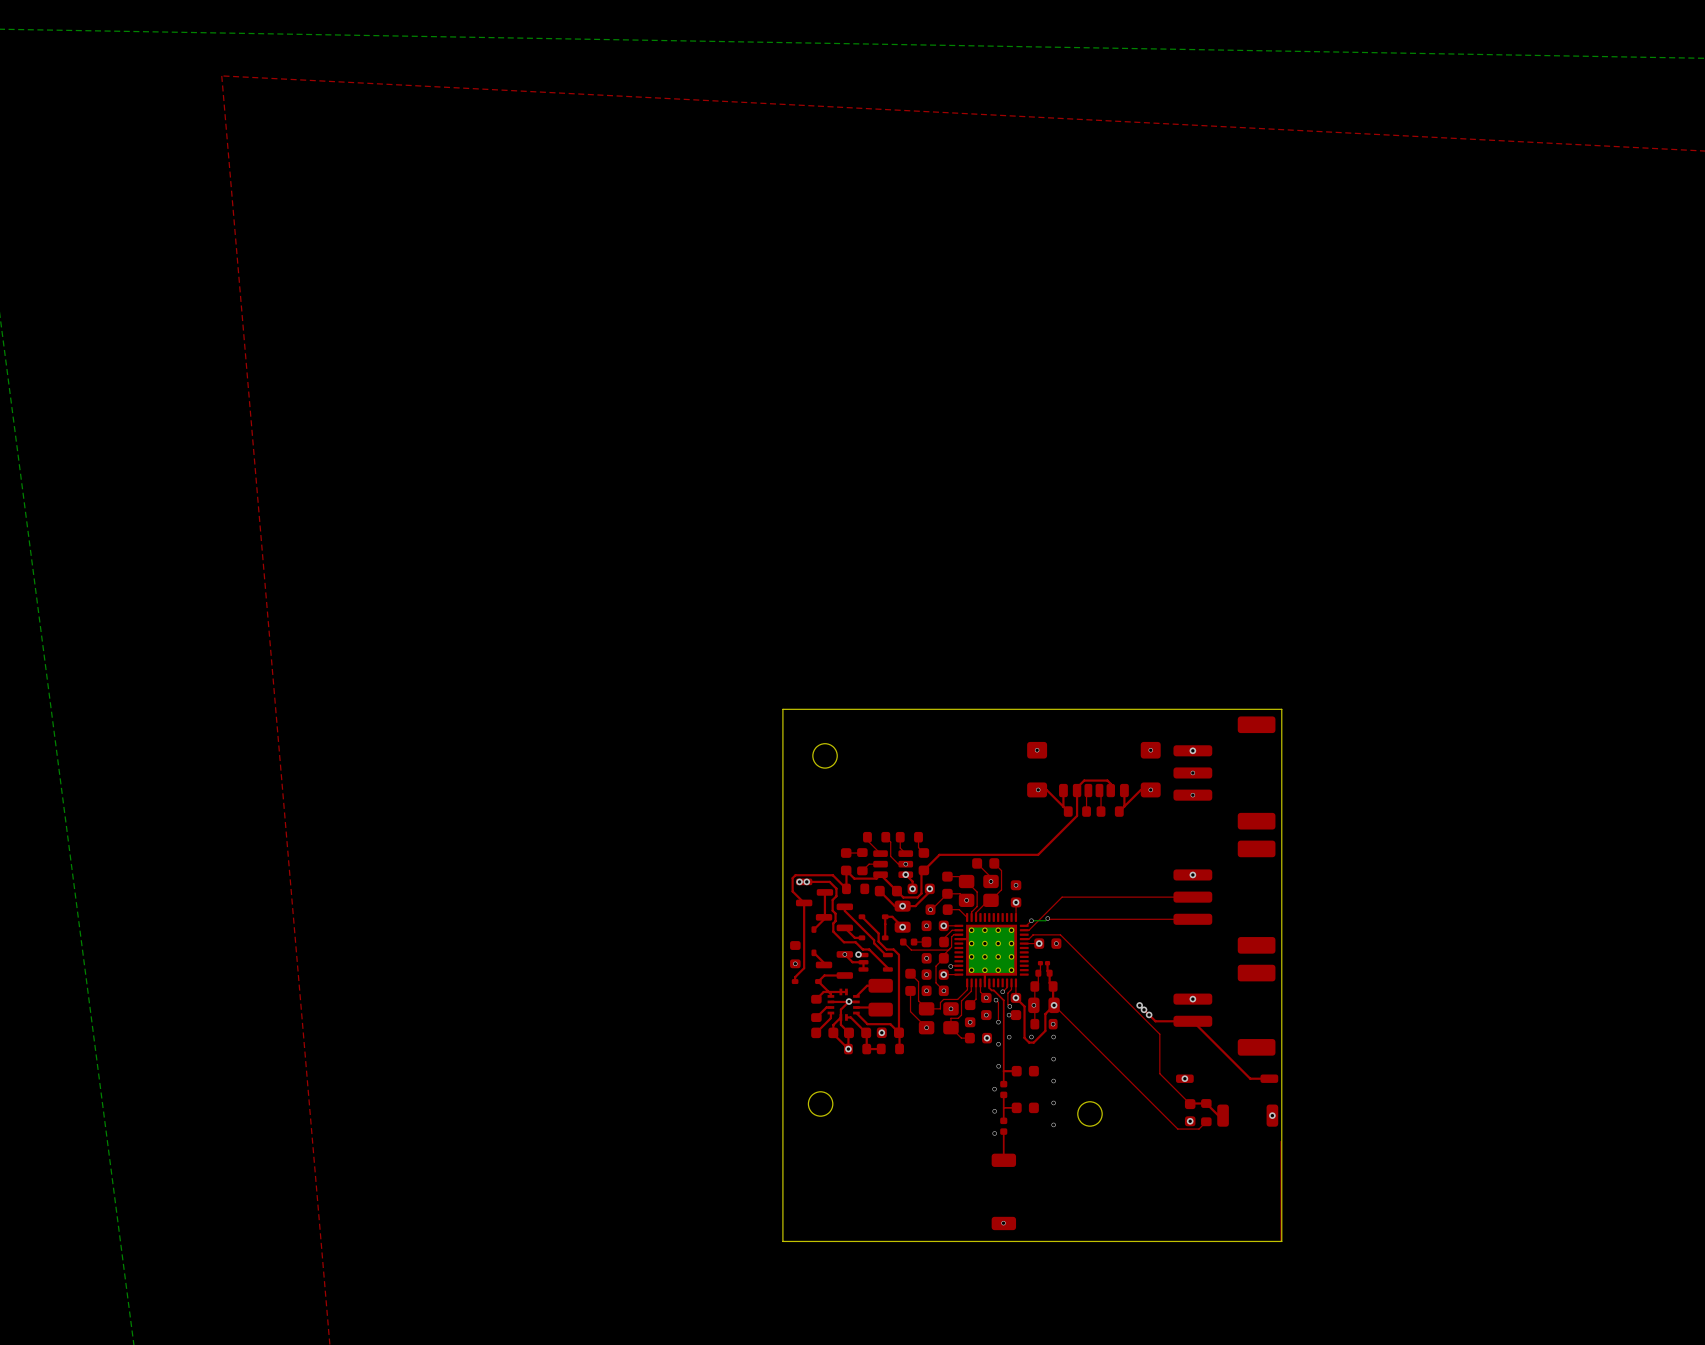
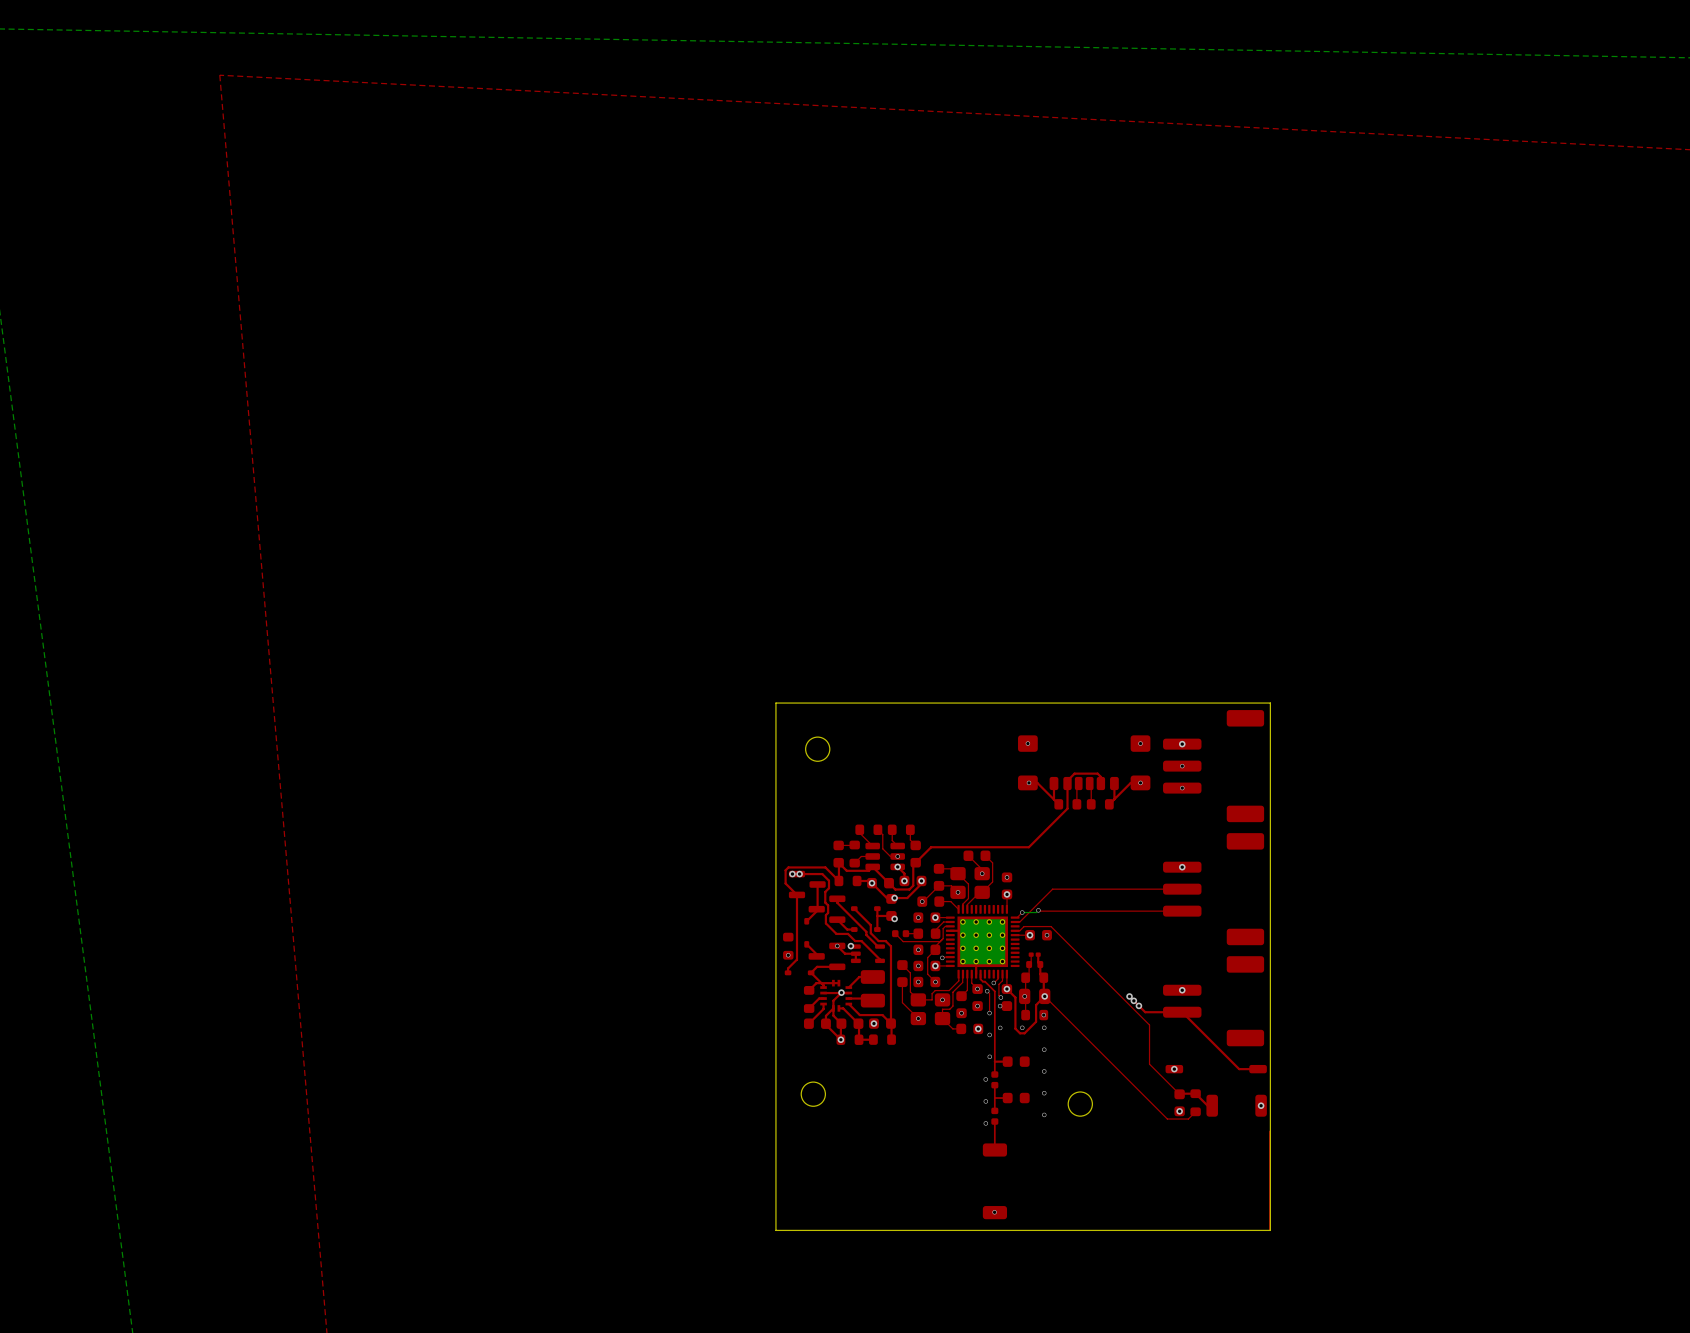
top track: none -> (869, 880) (857, 880)
via: none -> (871, 883)
part footprint: [894, 900, 911, 933] -> [886, 893, 897, 921]
top track: (885, 916) (892, 916) (902, 927) -> none
top track: none -> (891, 915) (877, 915)

